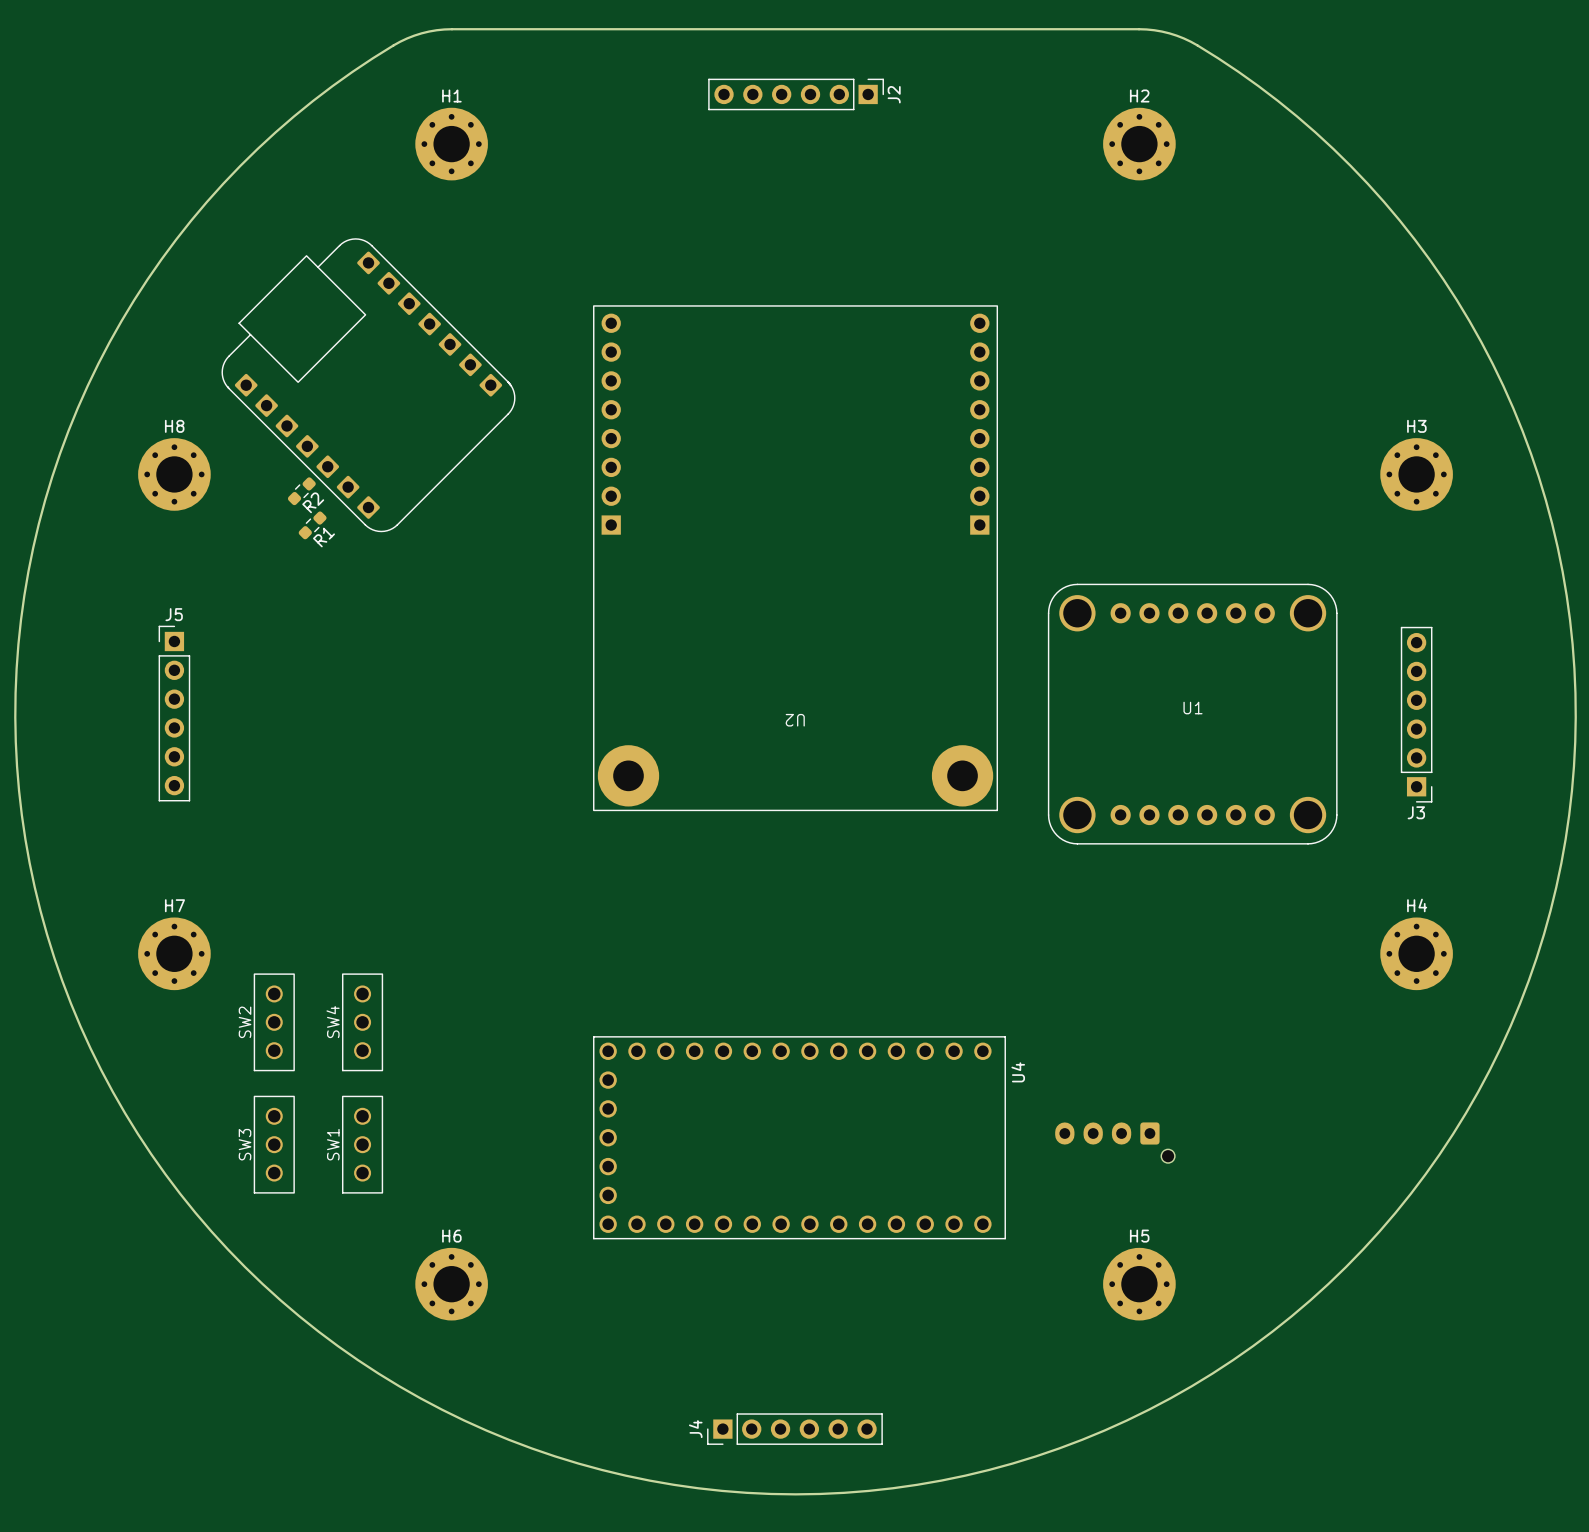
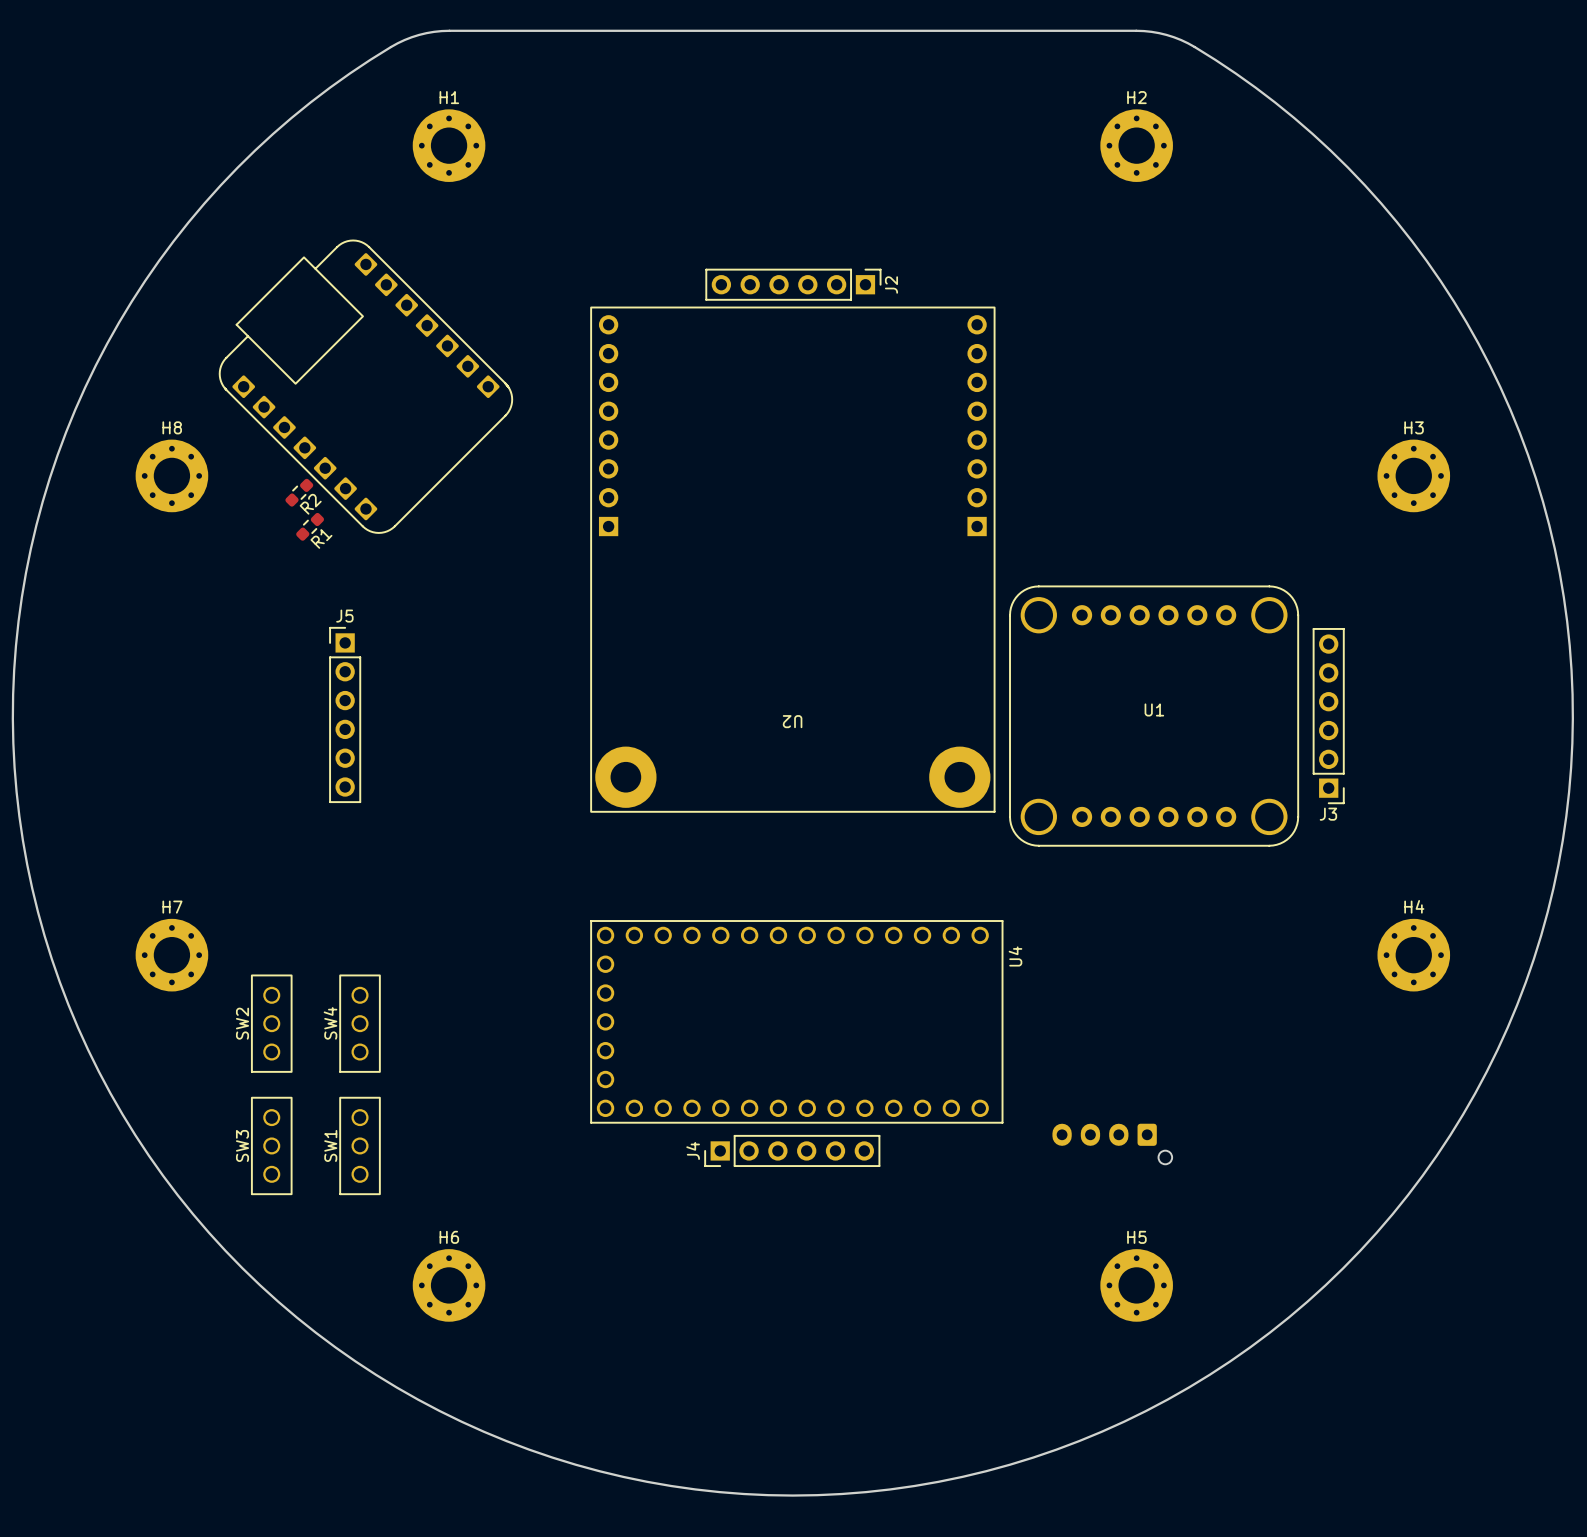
J2 position: (796, 94) -> (793, 284)
J5 position: (174, 713) -> (345, 714)
U1 position: (1192, 714) -> (1154, 716)
J3 position: (1416, 714) -> (1328, 716)
U4 position: (799, 1137) -> (796, 1021)
J4 position: (794, 1429) -> (792, 1150)

